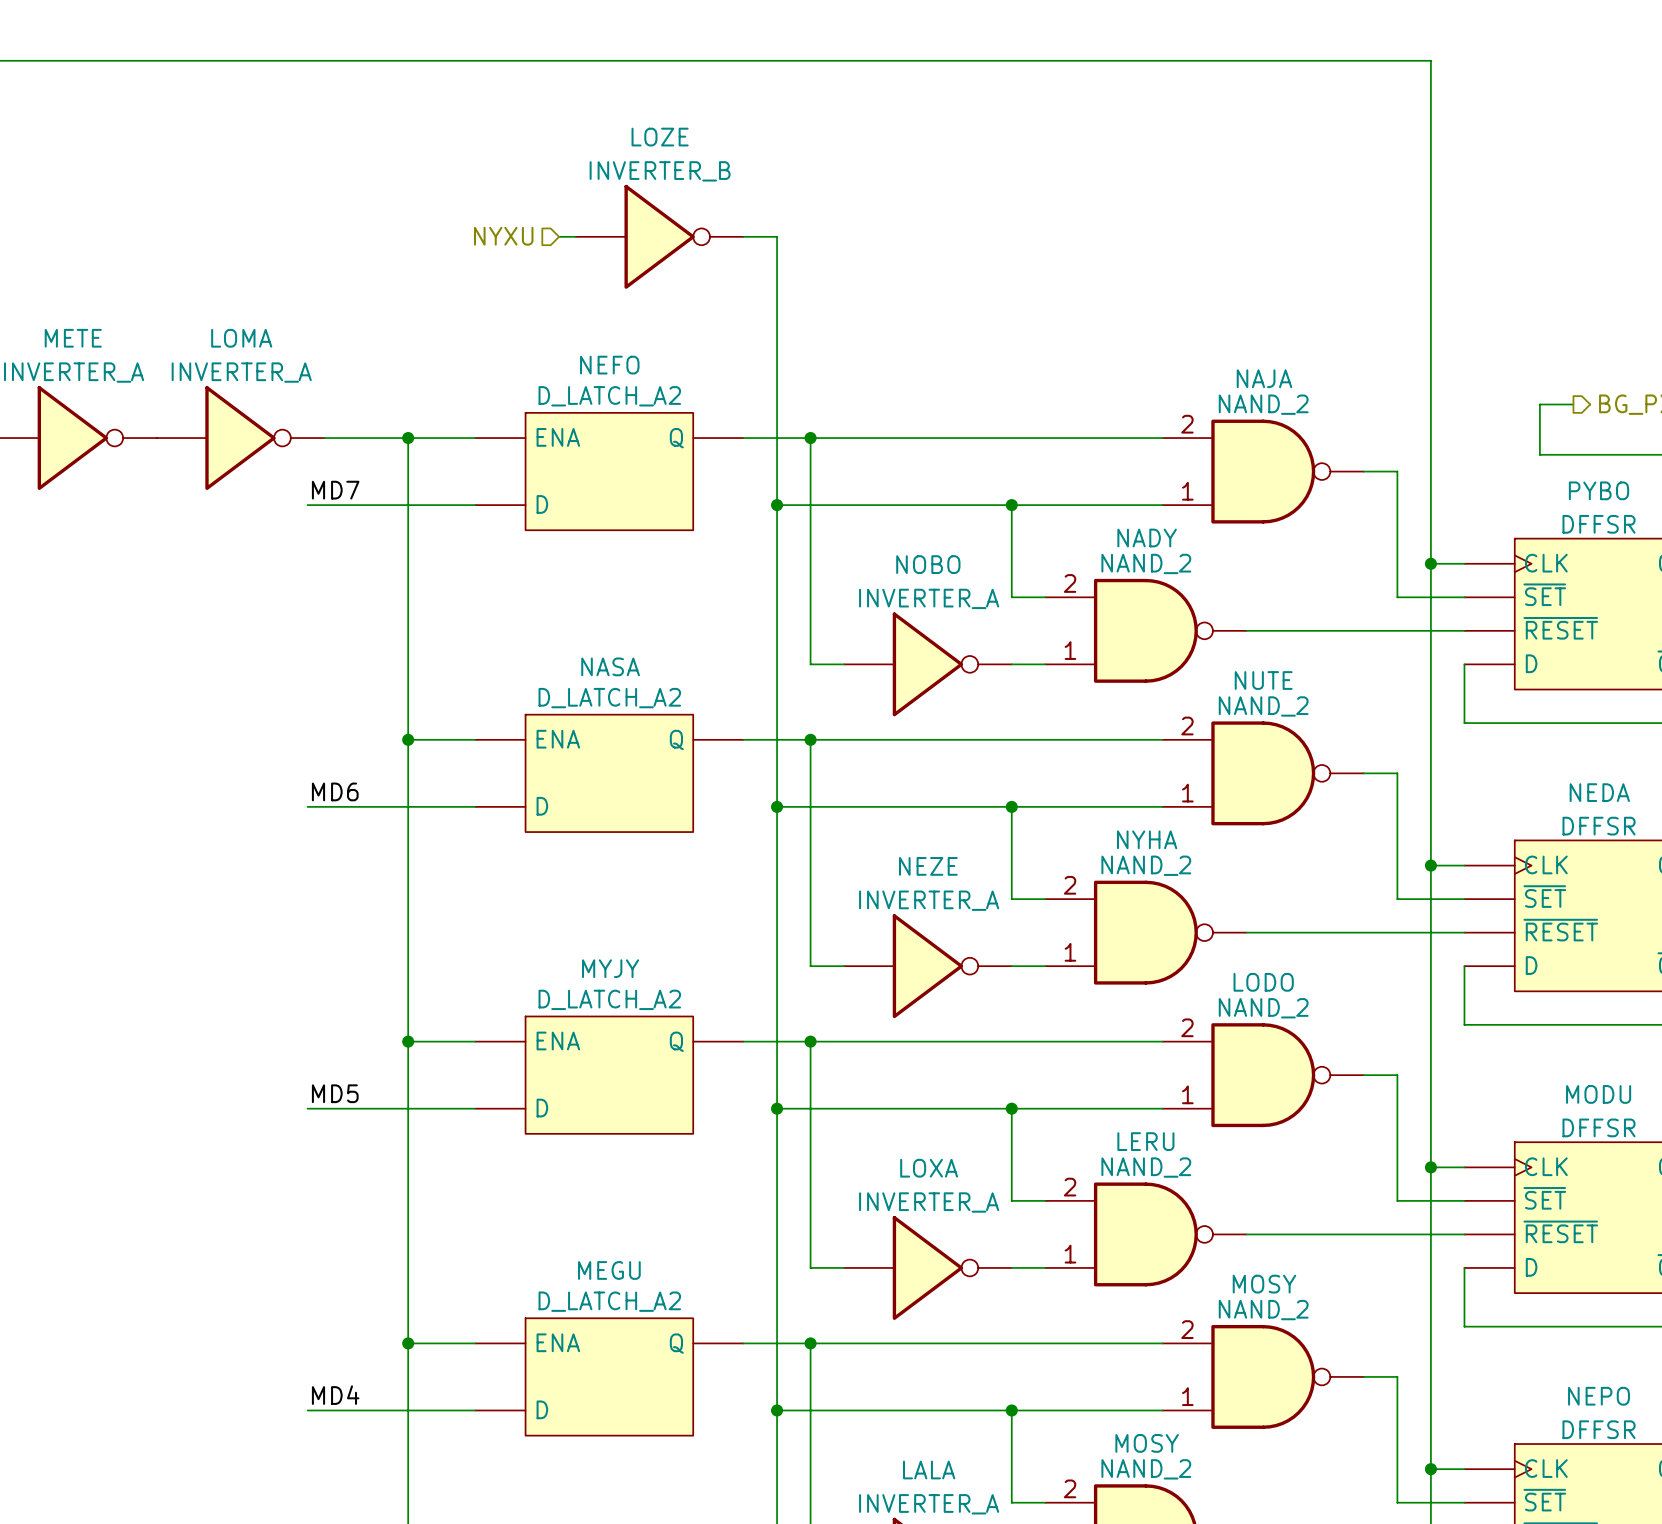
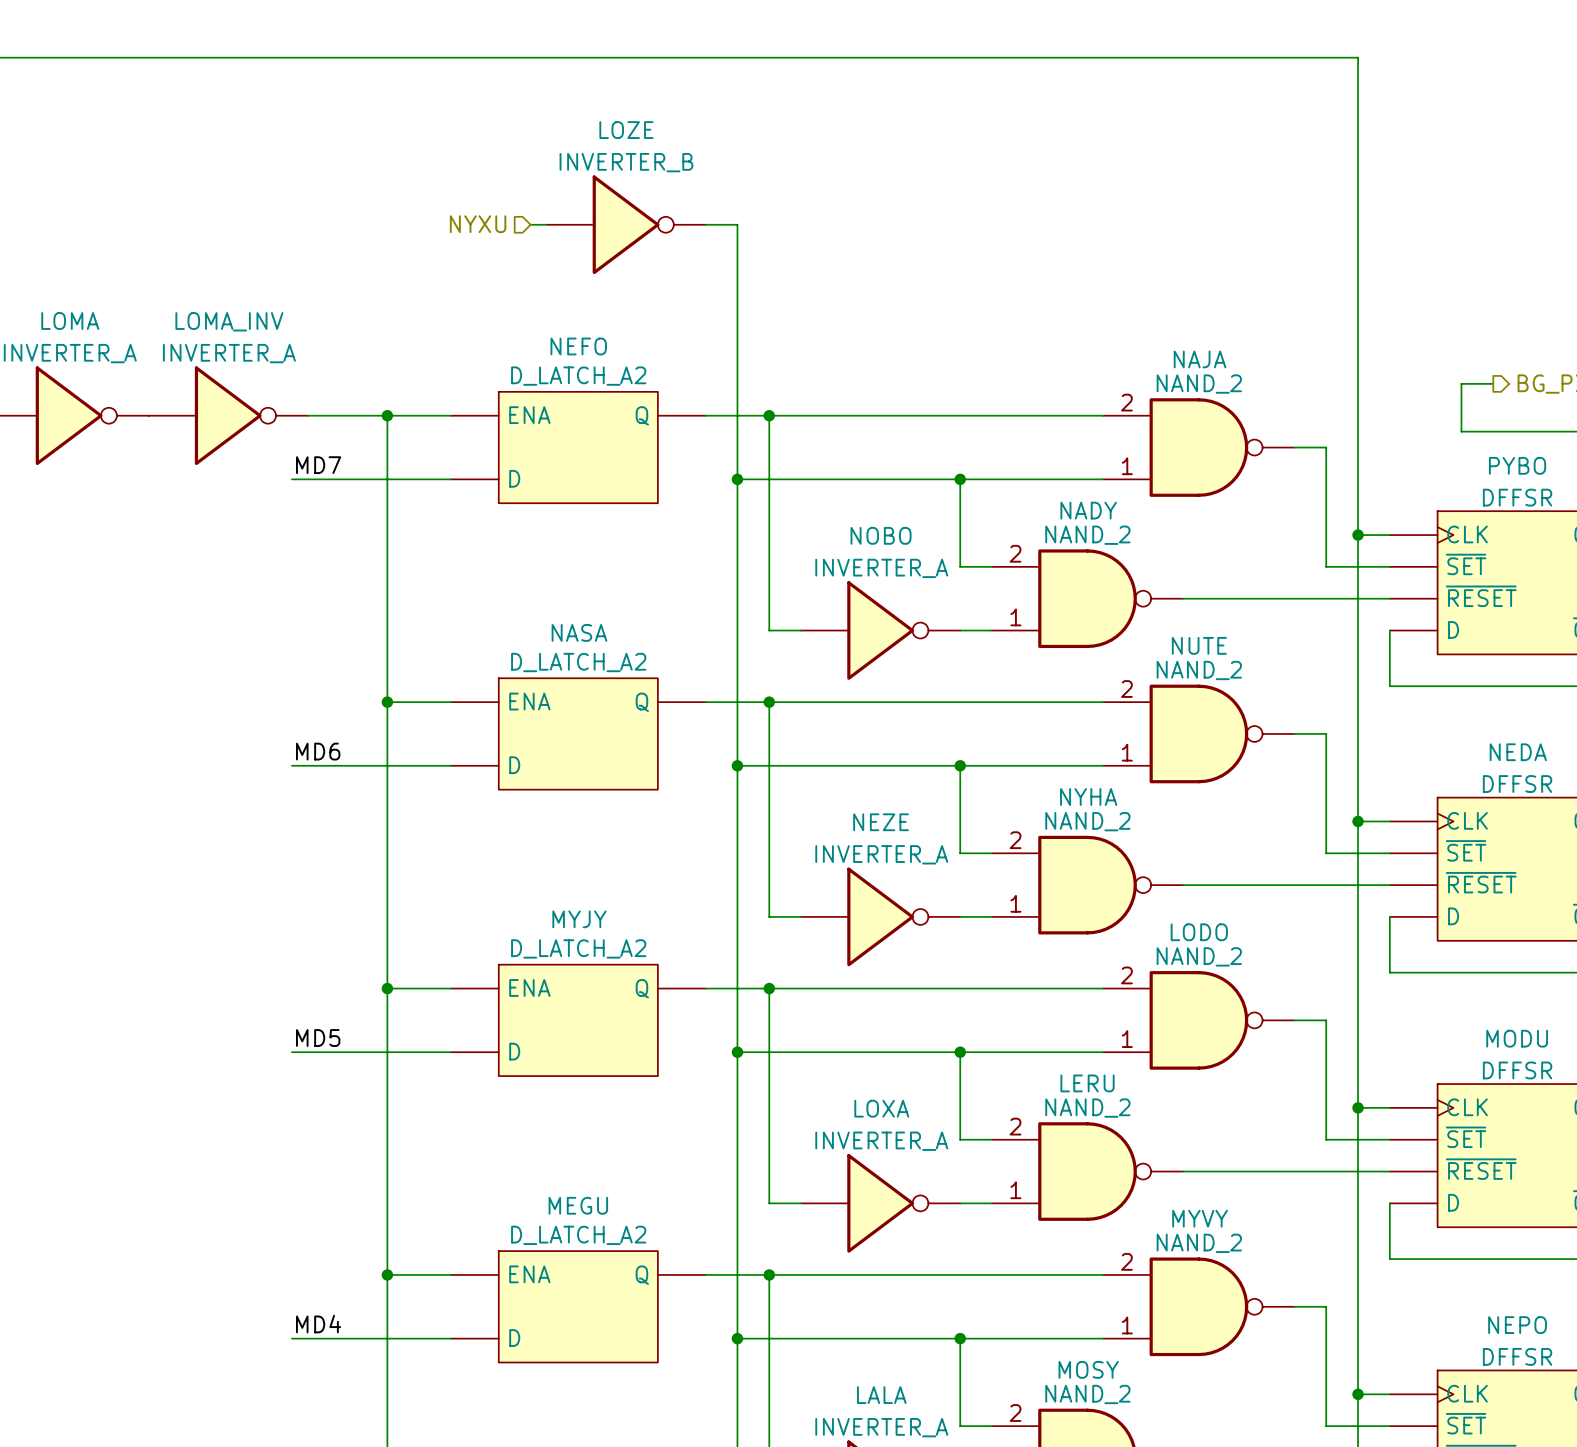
METE name: METE (73, 338) -> LOMA (70, 321)
LOMA name: LOMA (241, 338) -> LOMA_INV (229, 321)
MOSY name: MOSY (1264, 1284) -> MYVY (1200, 1218)

